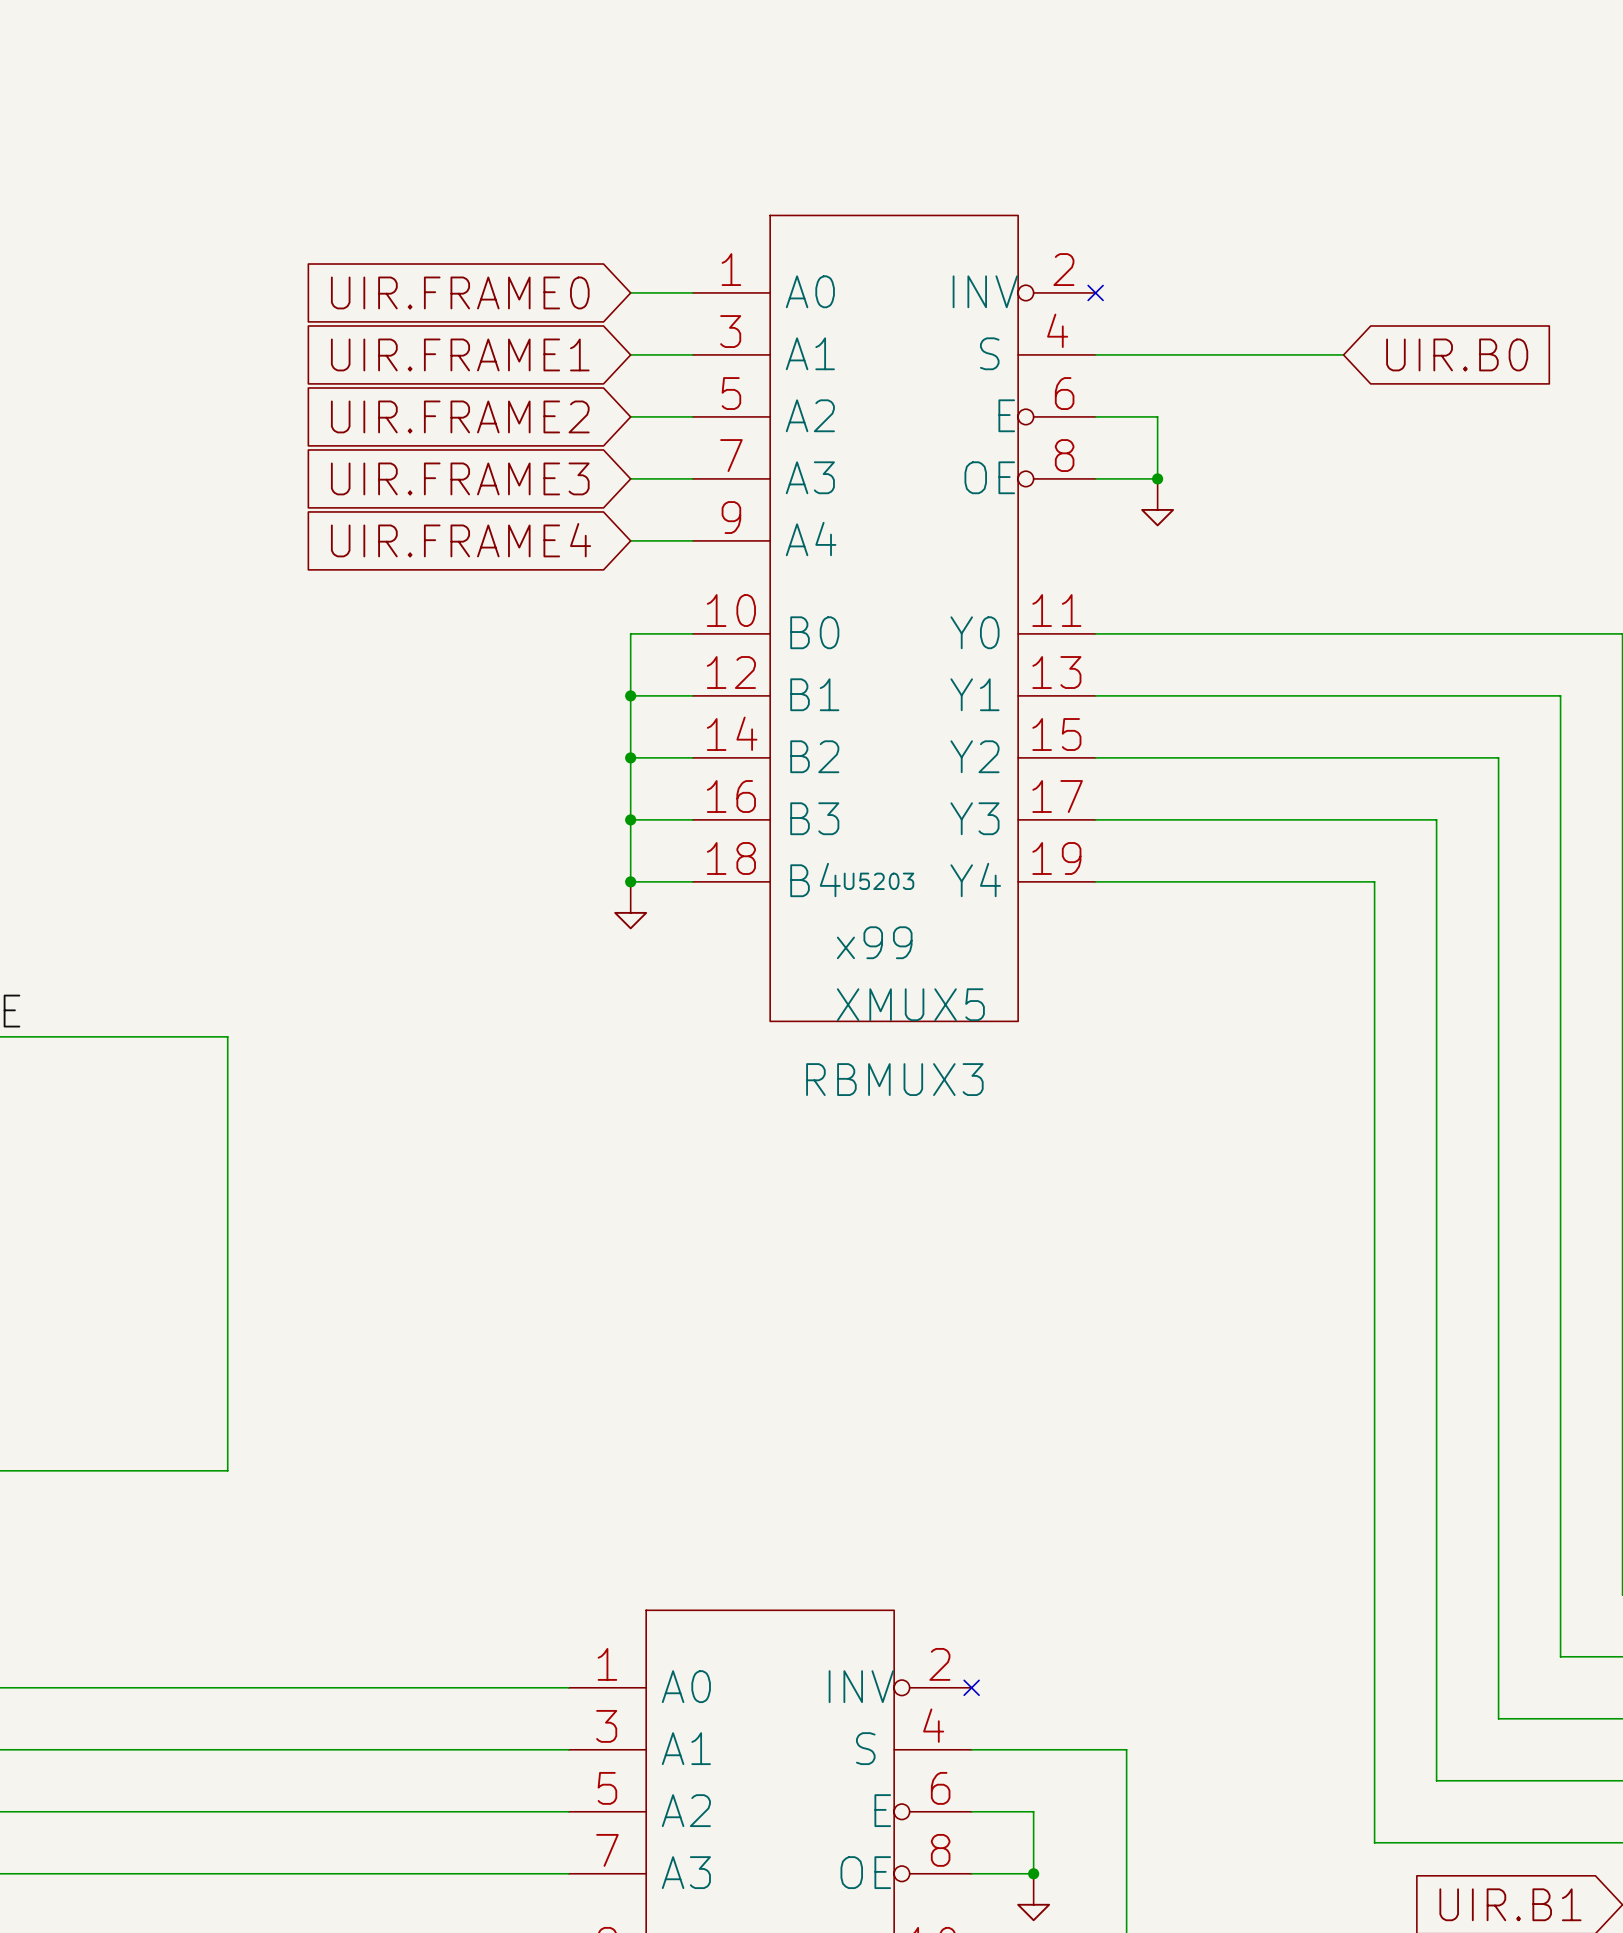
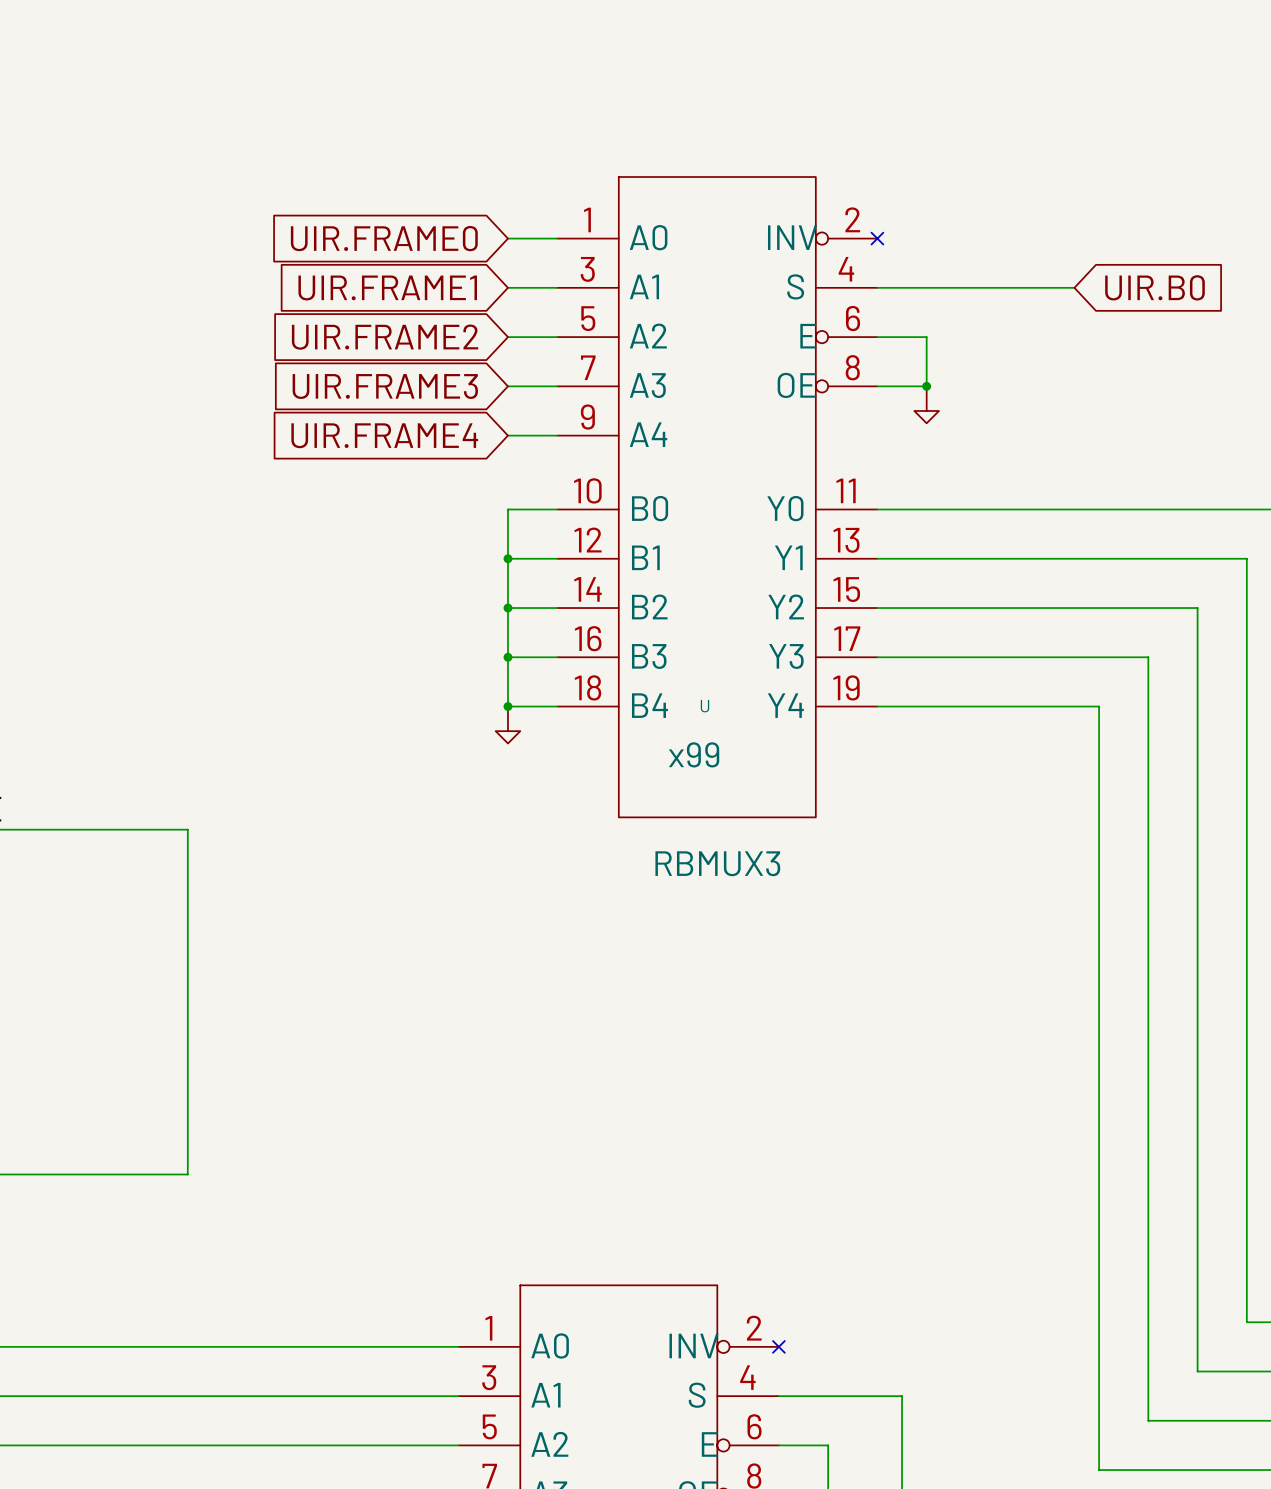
U5203 name: U5203 (879, 881) -> U (705, 706)
U5203 value: XMUX5 (910, 1004) -> none

